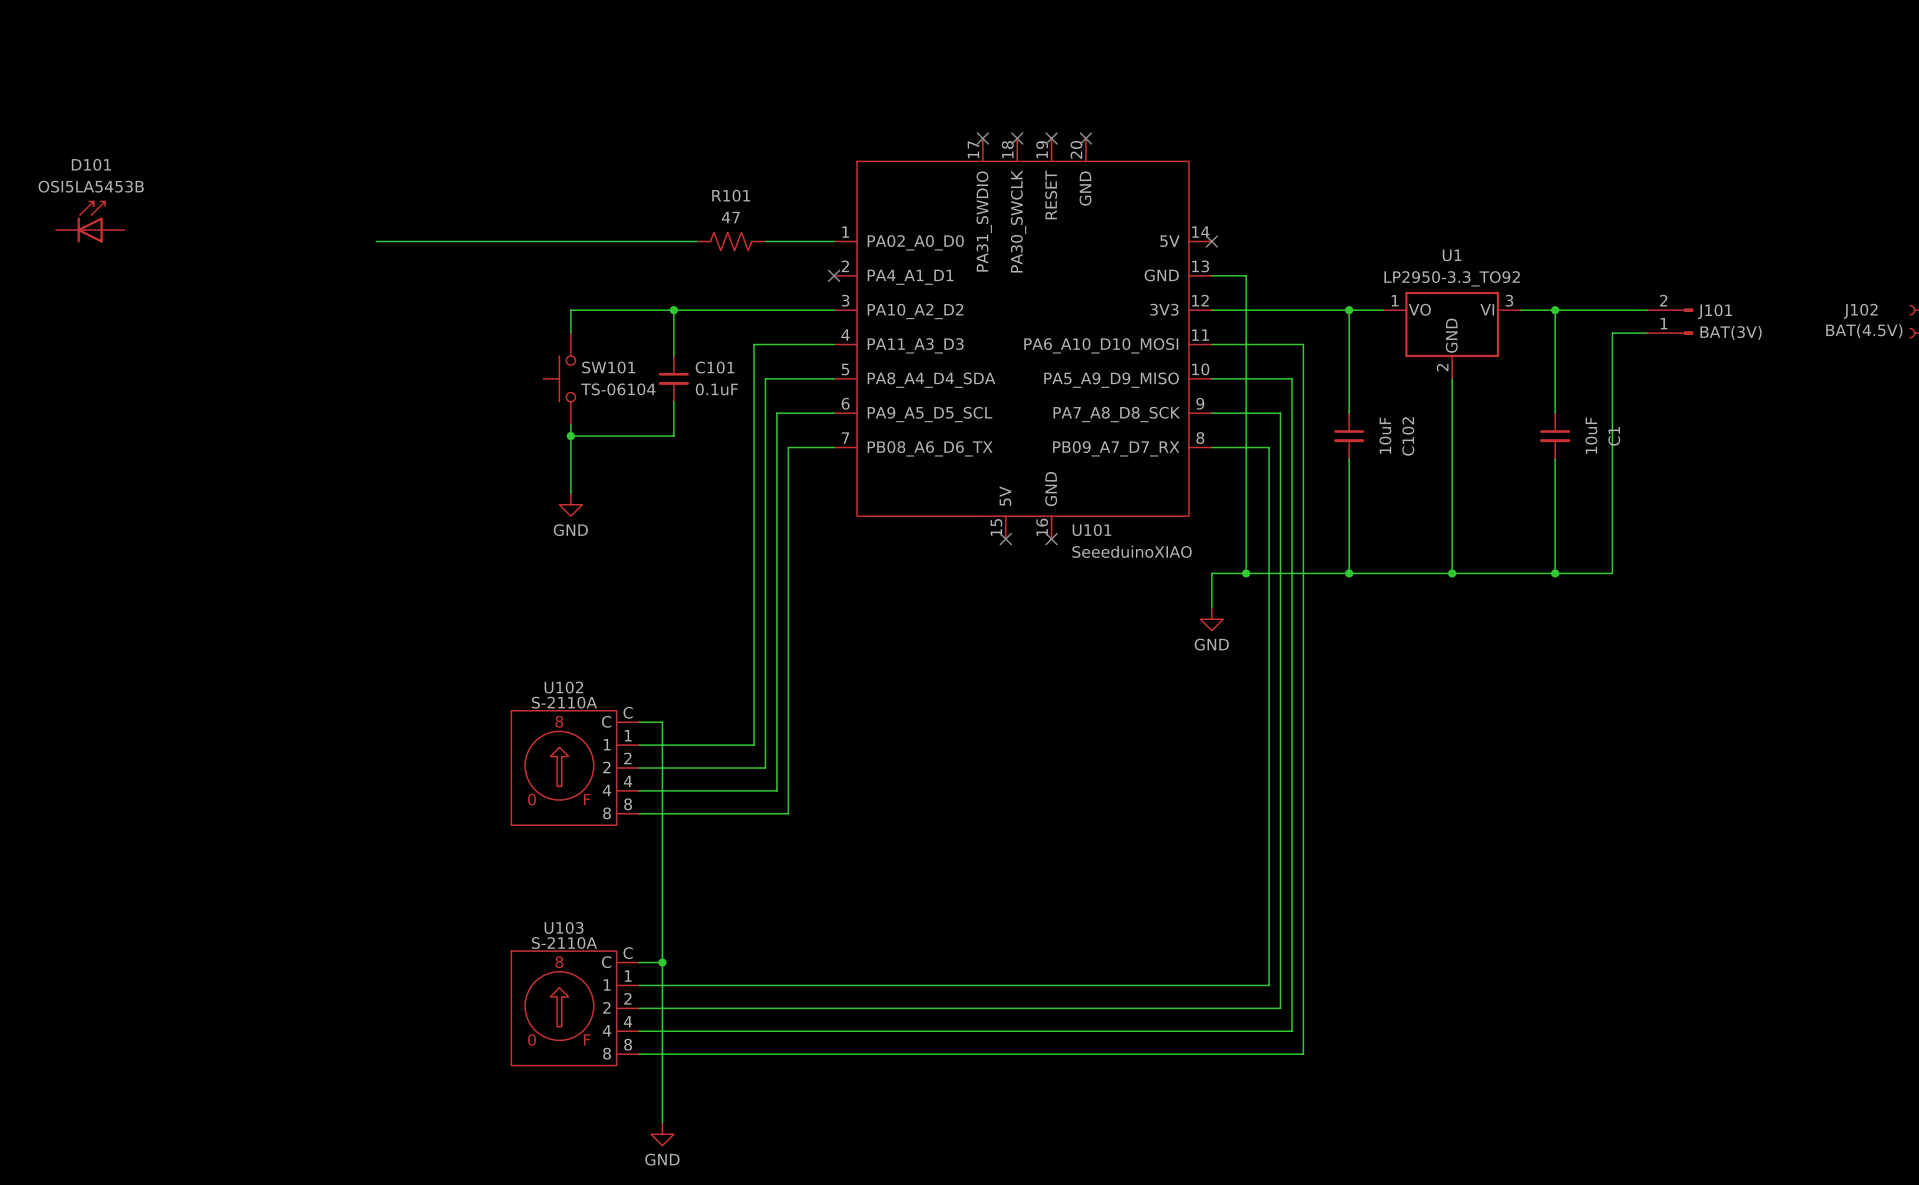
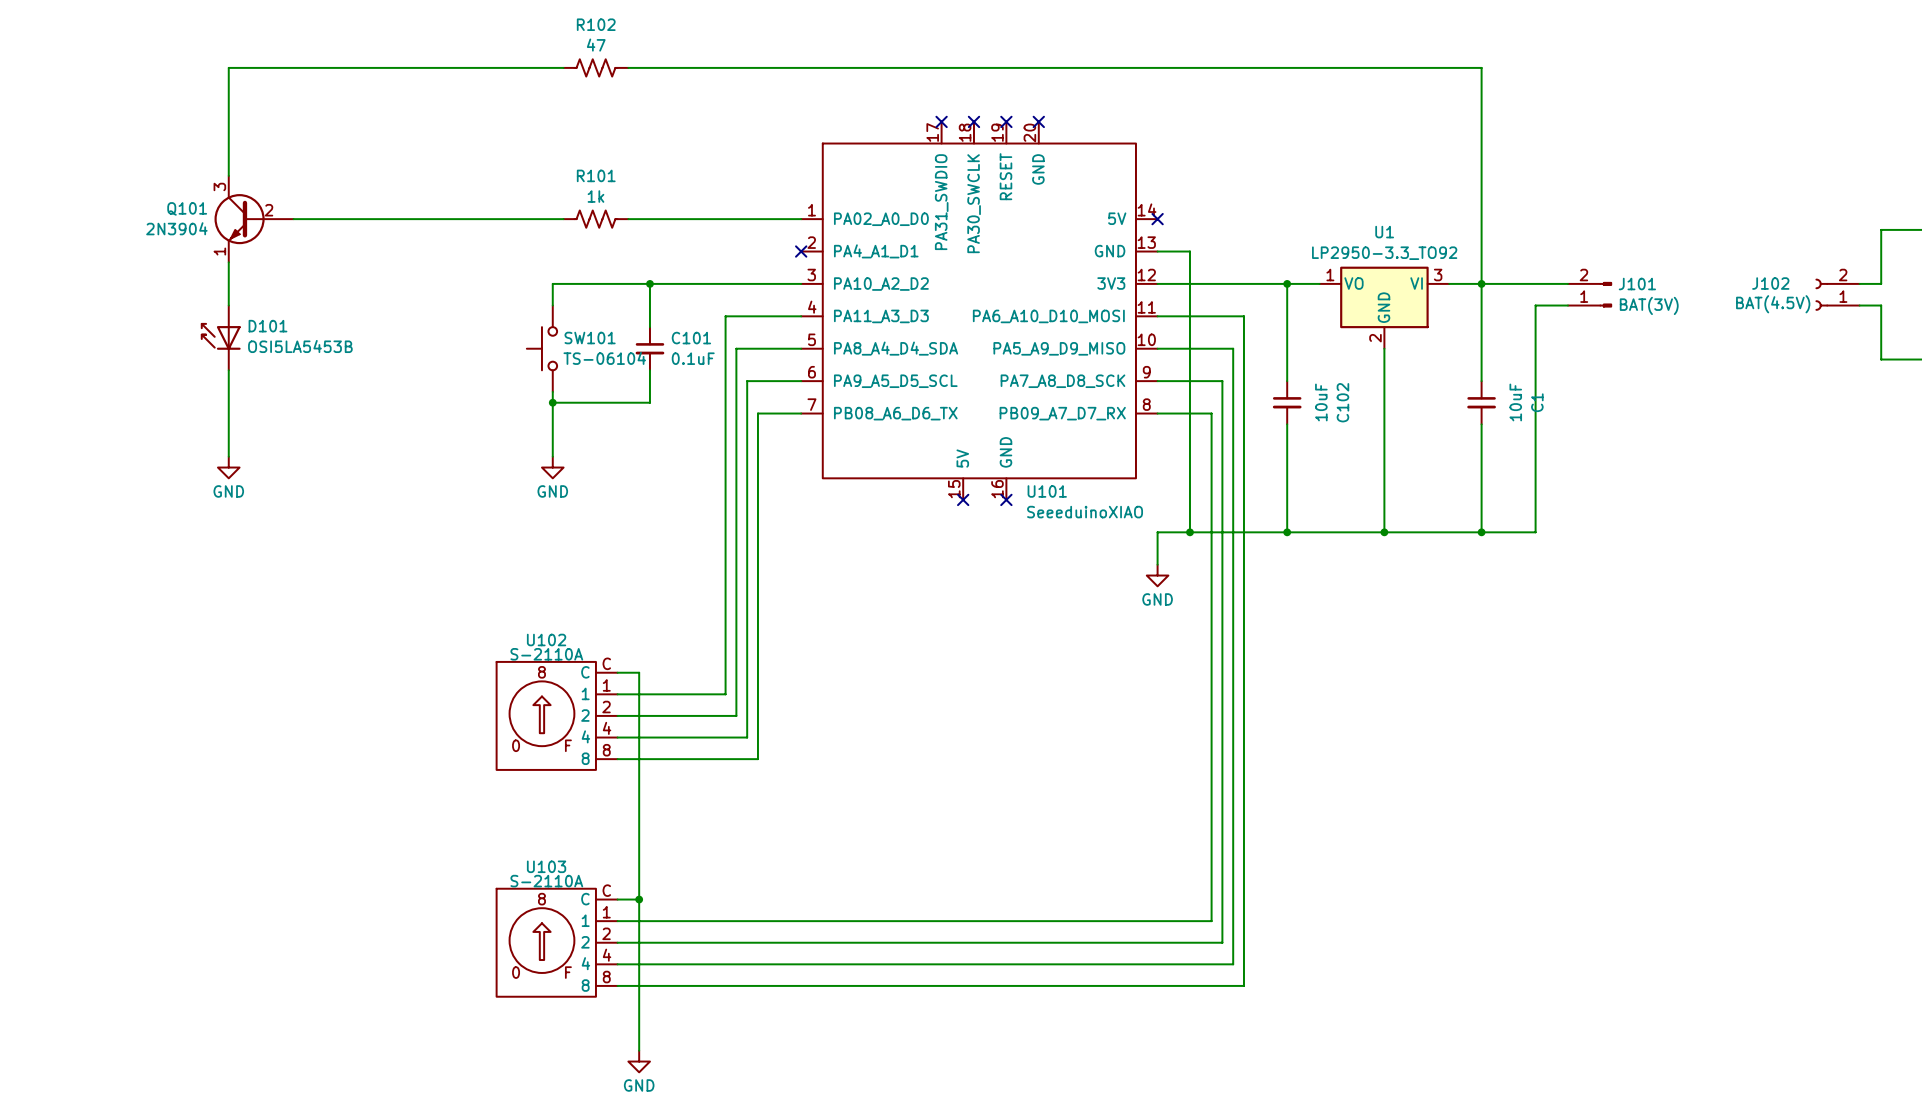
wire: none -> (563, 67) (228, 67) (228, 175)
R102: none -> 47 (595, 67)
wire: none -> (628, 67) (1481, 67) (1481, 283)
D101 name position: D101 (91, 164) -> D101 (267, 326)
D101 value position: OSI5LA5453B (91, 186) -> OSI5LA5453B (300, 346)
R101 value: 47 (730, 217) -> 1k (595, 196)
D101 position: (90, 222) -> (221, 337)
D101 rotation: 0° (91, 222) -> 90° counterclockwise (221, 336)
Q101: none -> 2N3904 (254, 219)
wire: none -> (293, 219) (369, 219)
R101 position: (731, 241) -> (595, 219)
wire: none -> (228, 262) (228, 305)
wire: none -> (228, 370) (228, 456)
power symbol: none -> GND (228, 467)

